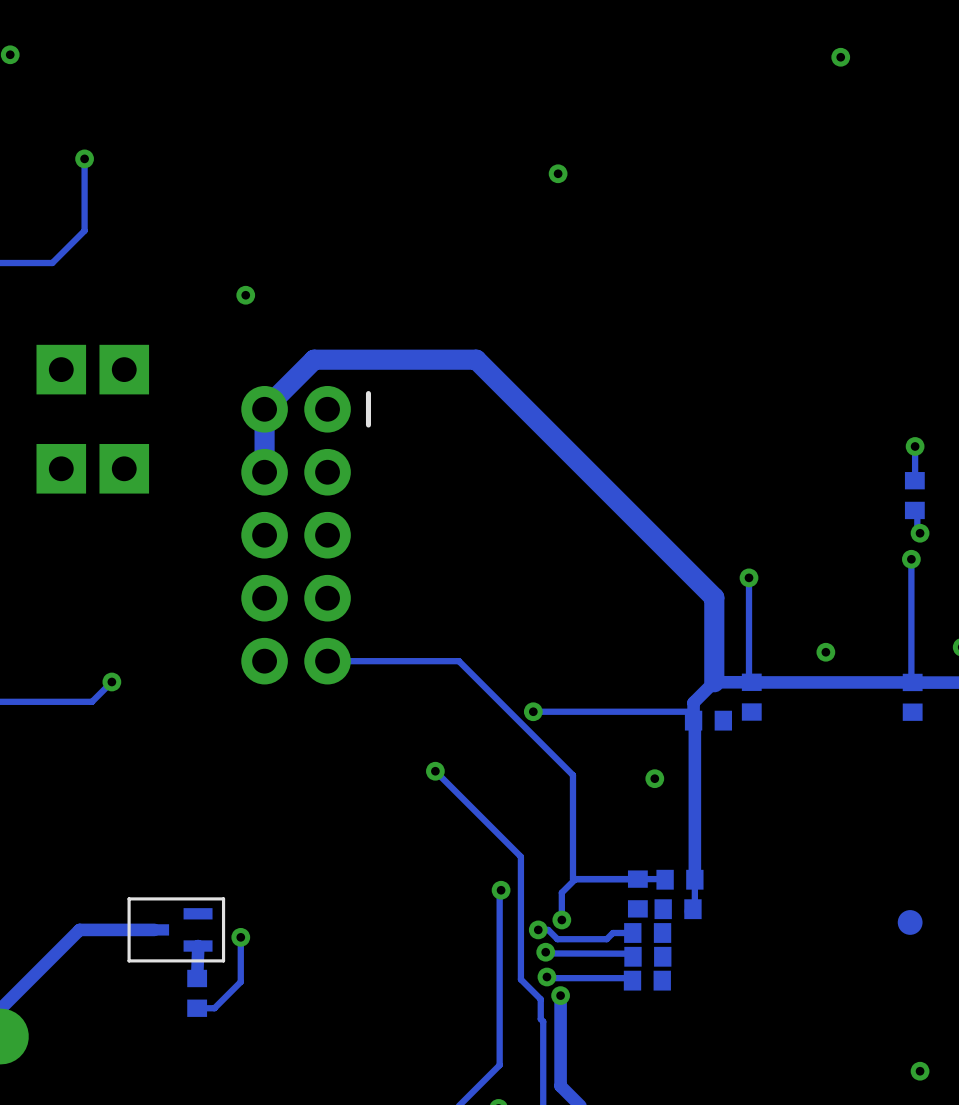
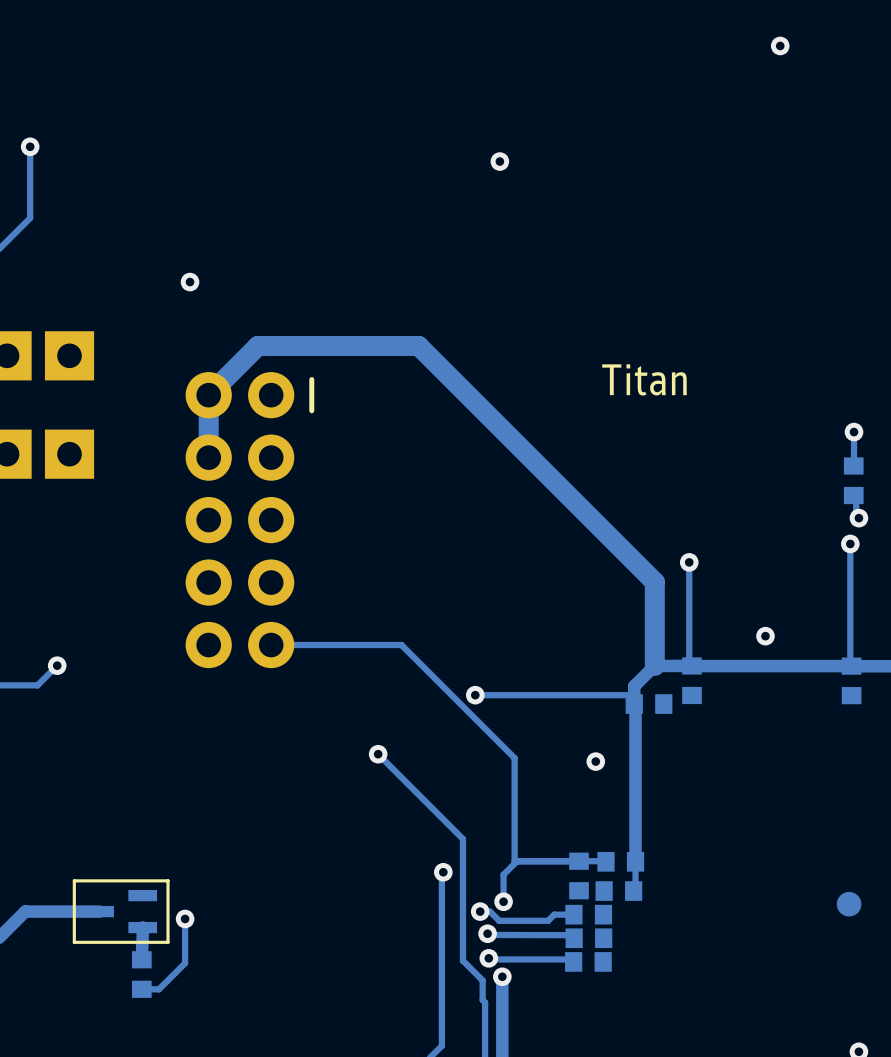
text: none -> Titan (644, 379)

